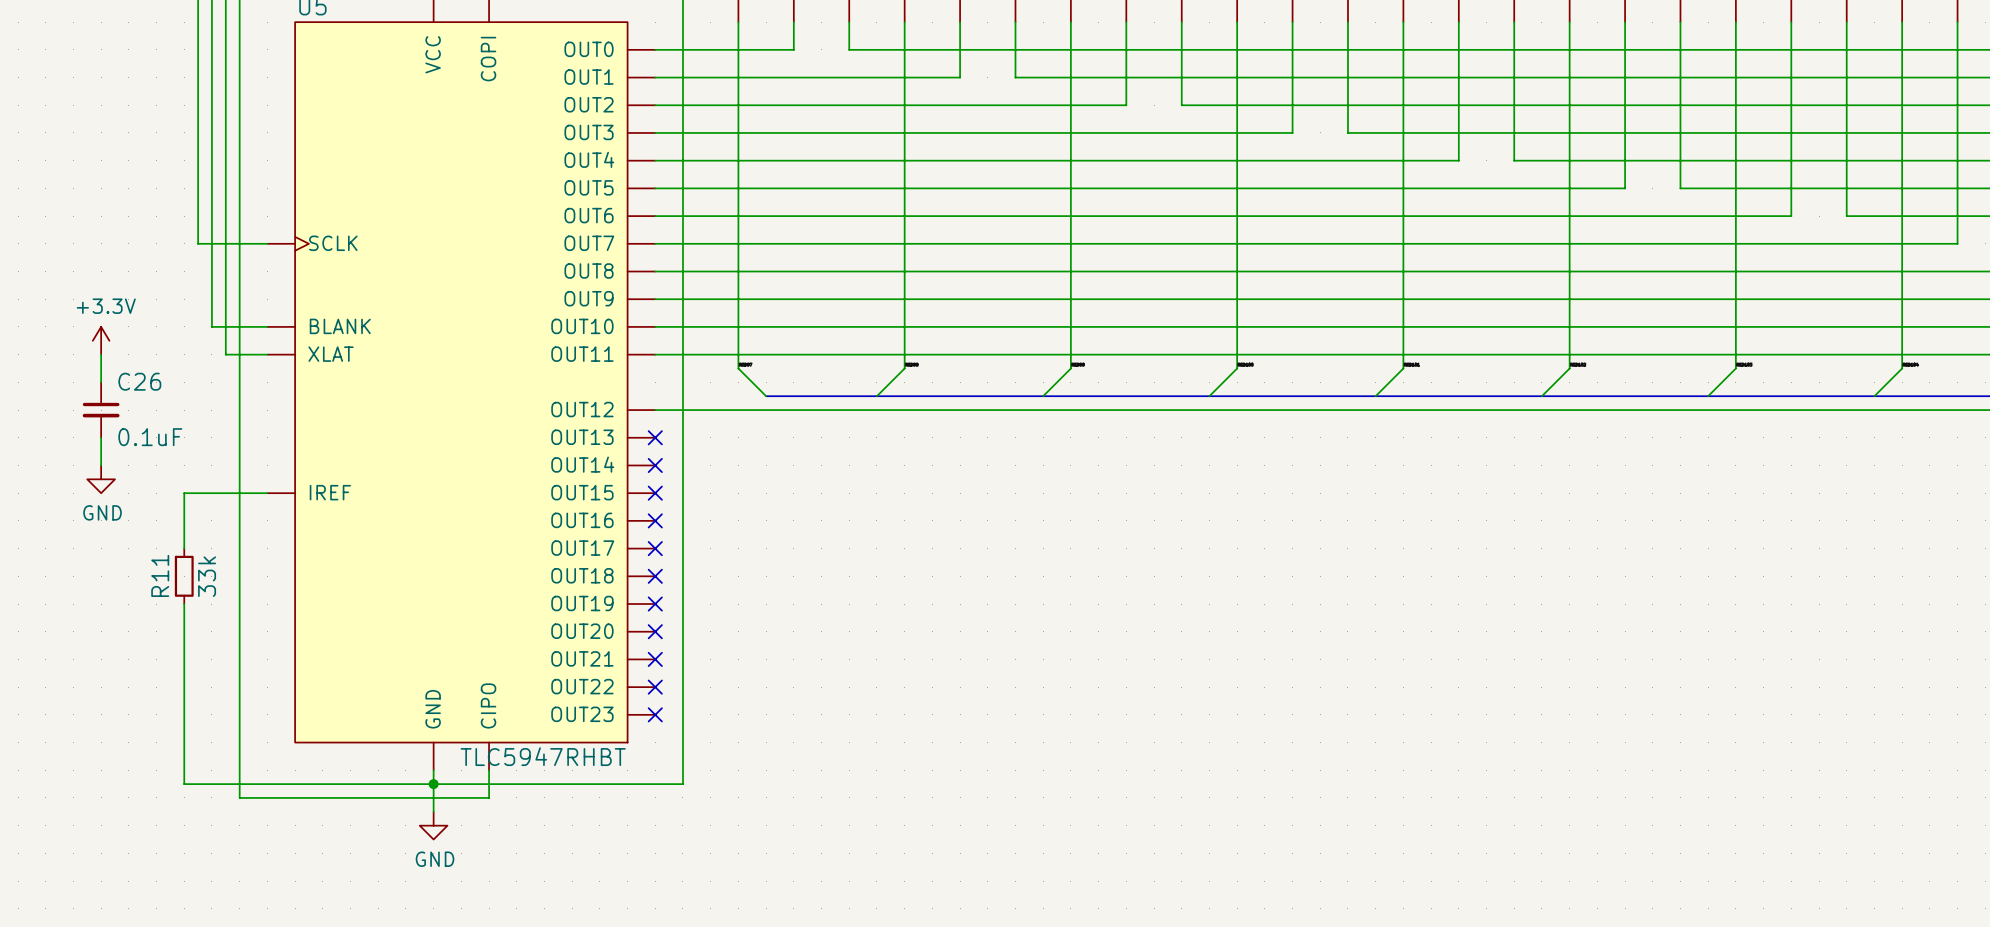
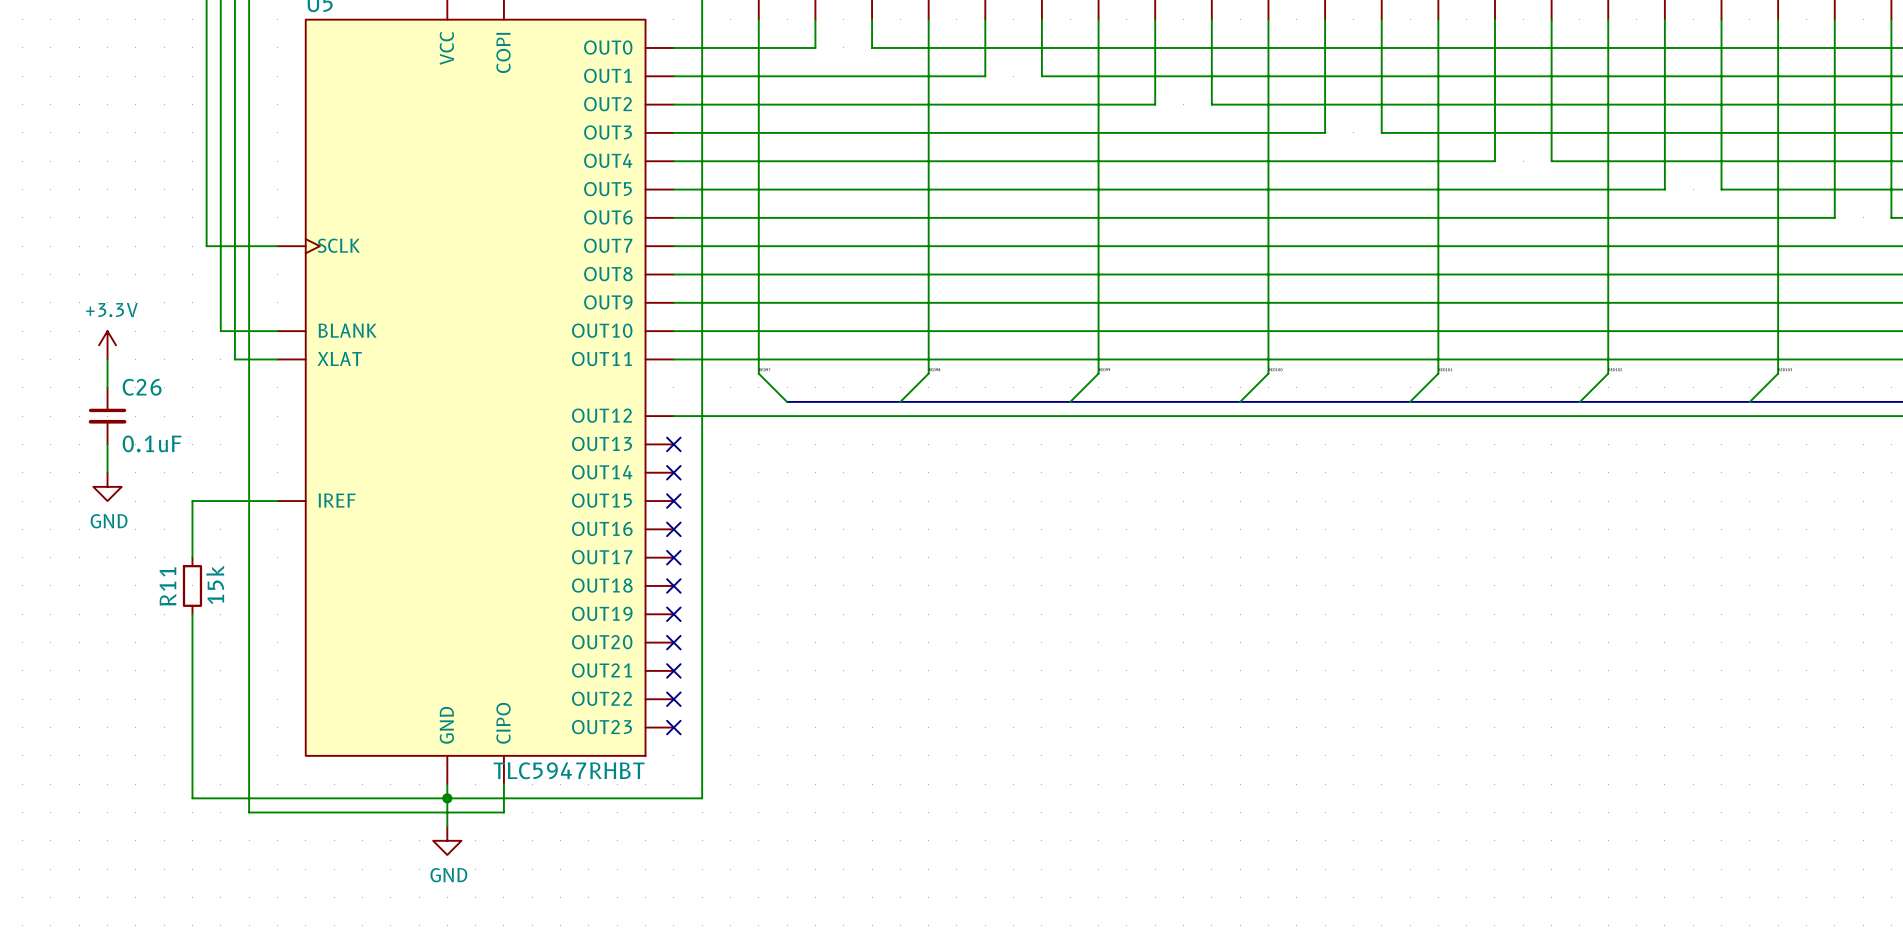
R11 value: 33k (207, 576) -> 15k (215, 584)

